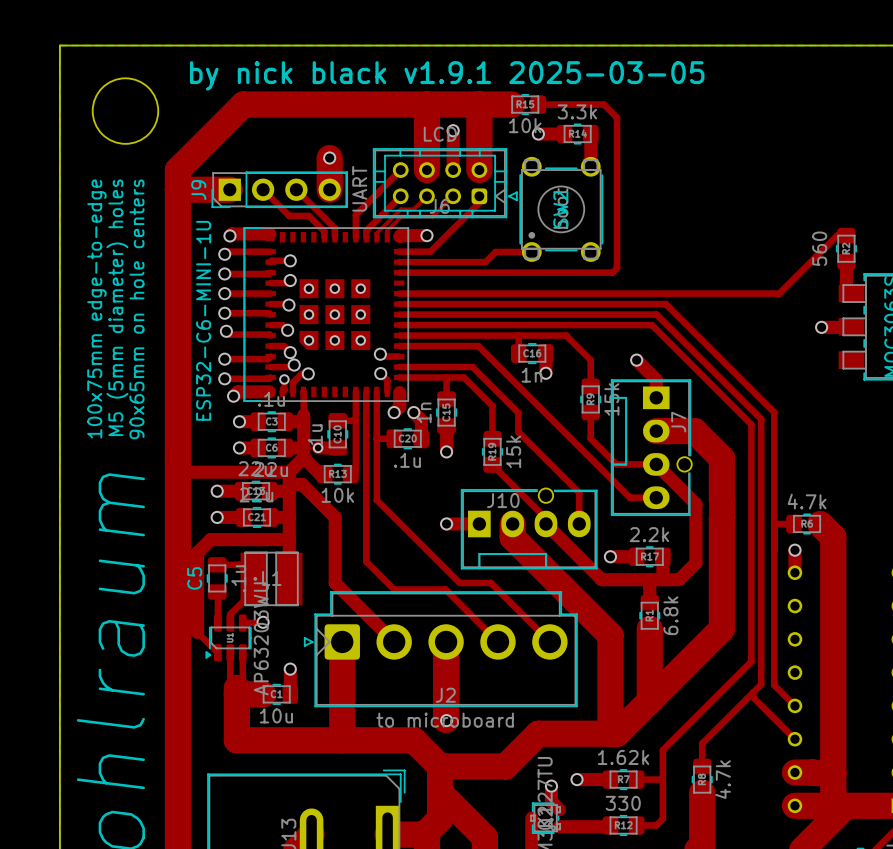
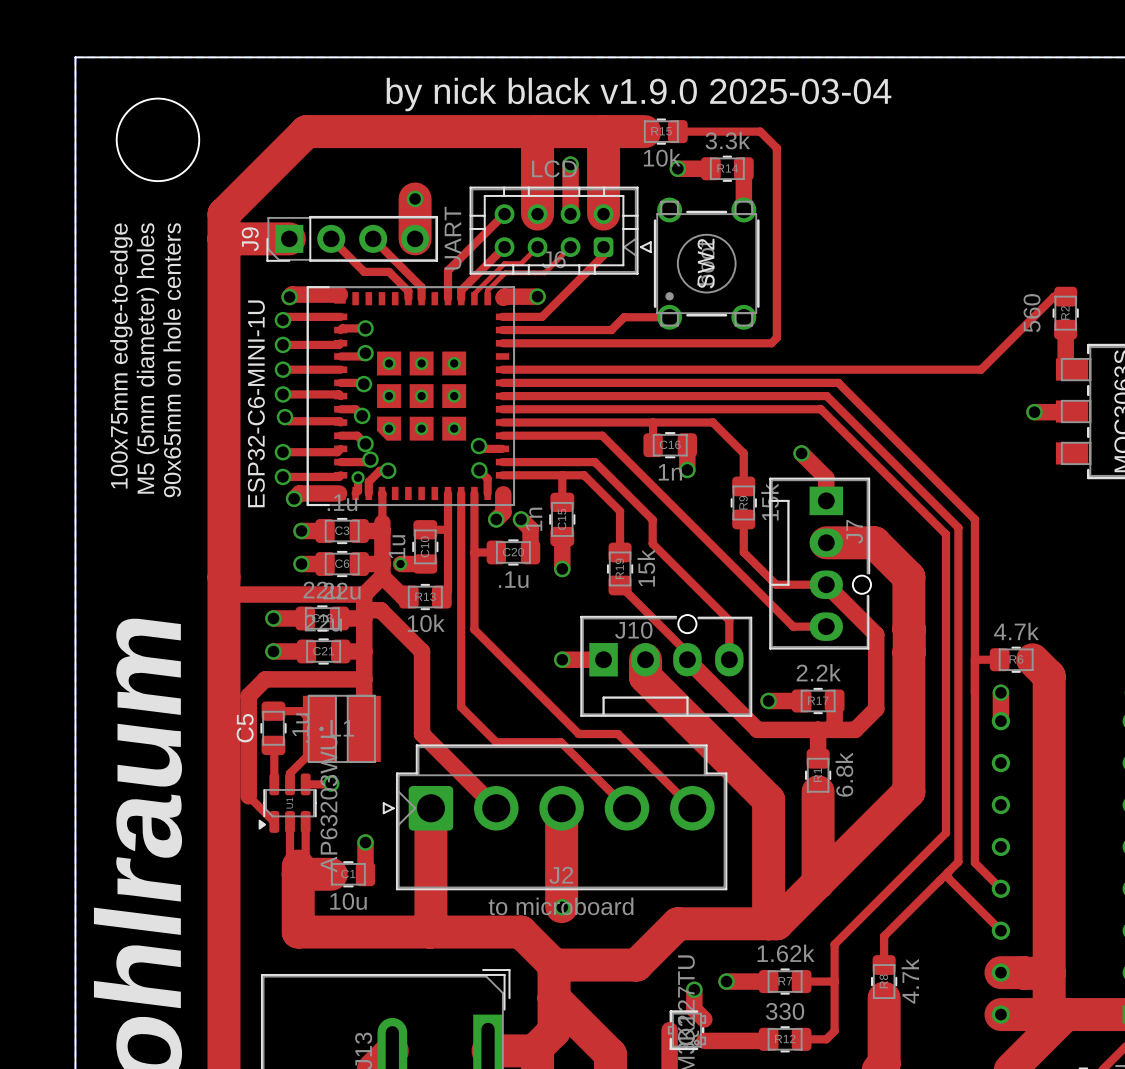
text: by nick black v1.9.1 2025-03-05 (447, 75) -> by nick black v1.9.0 2025-03-04 (638, 94)

